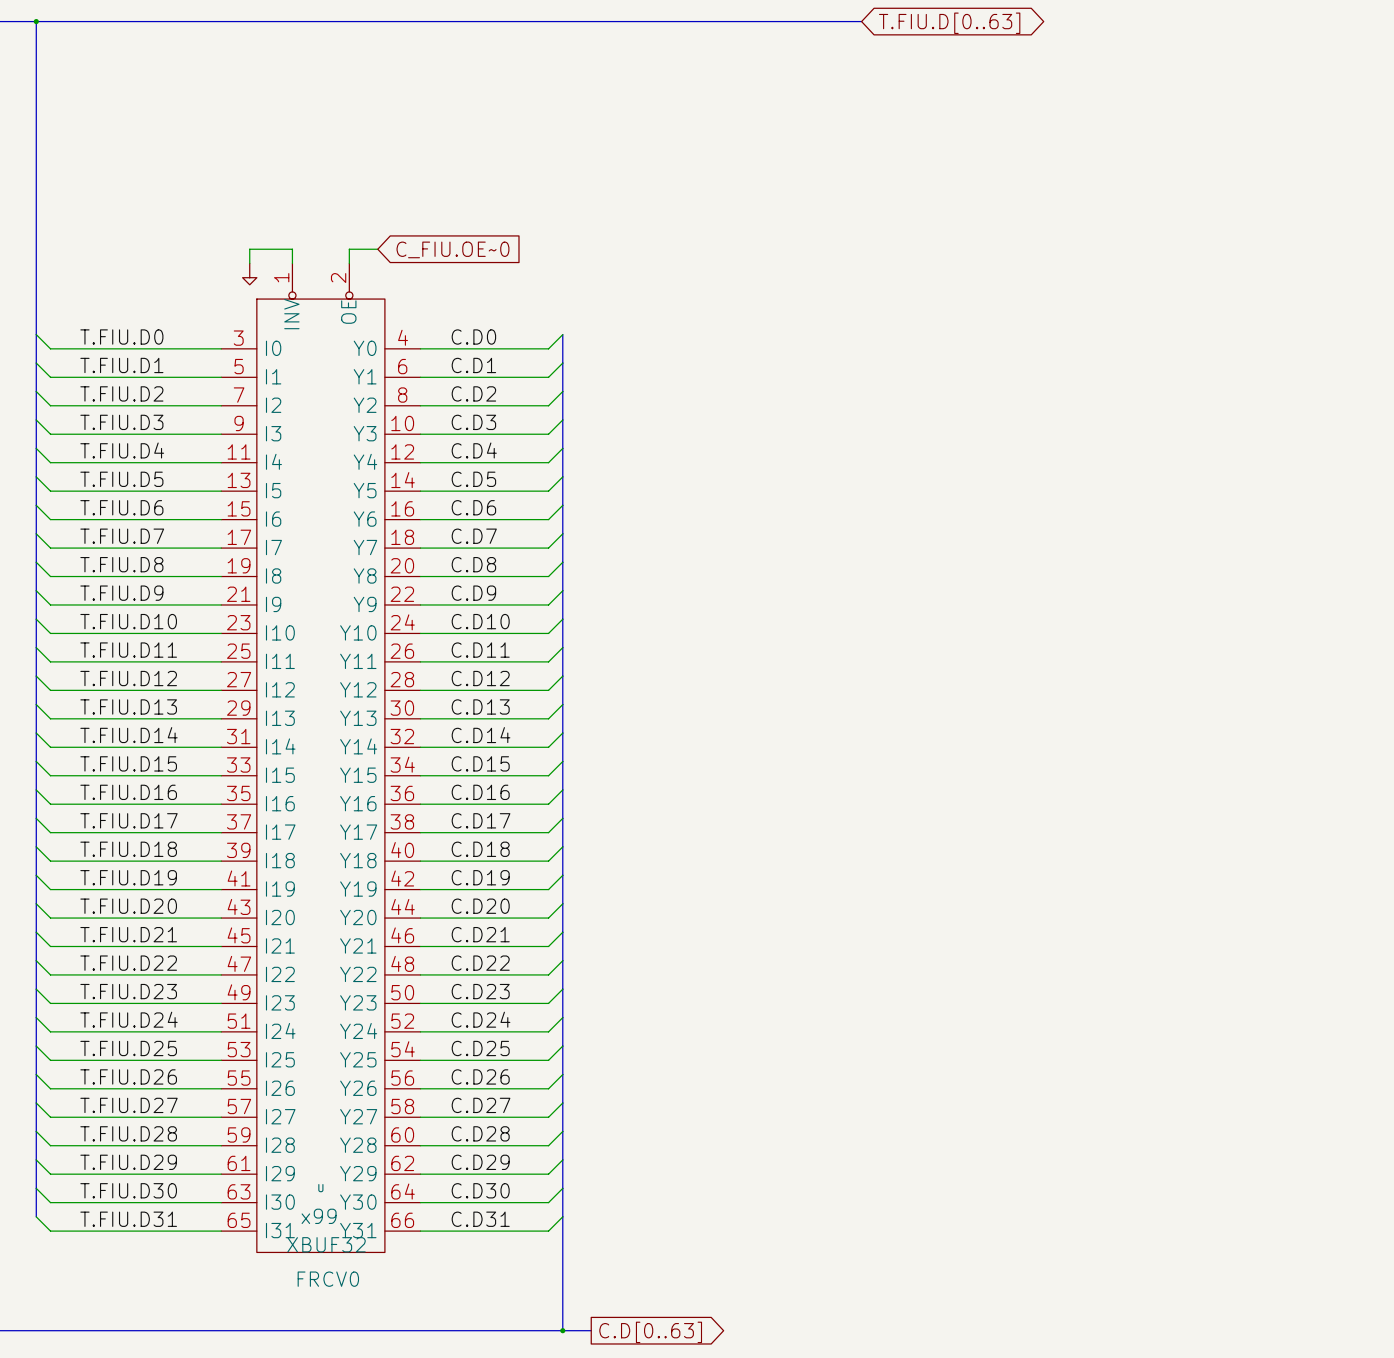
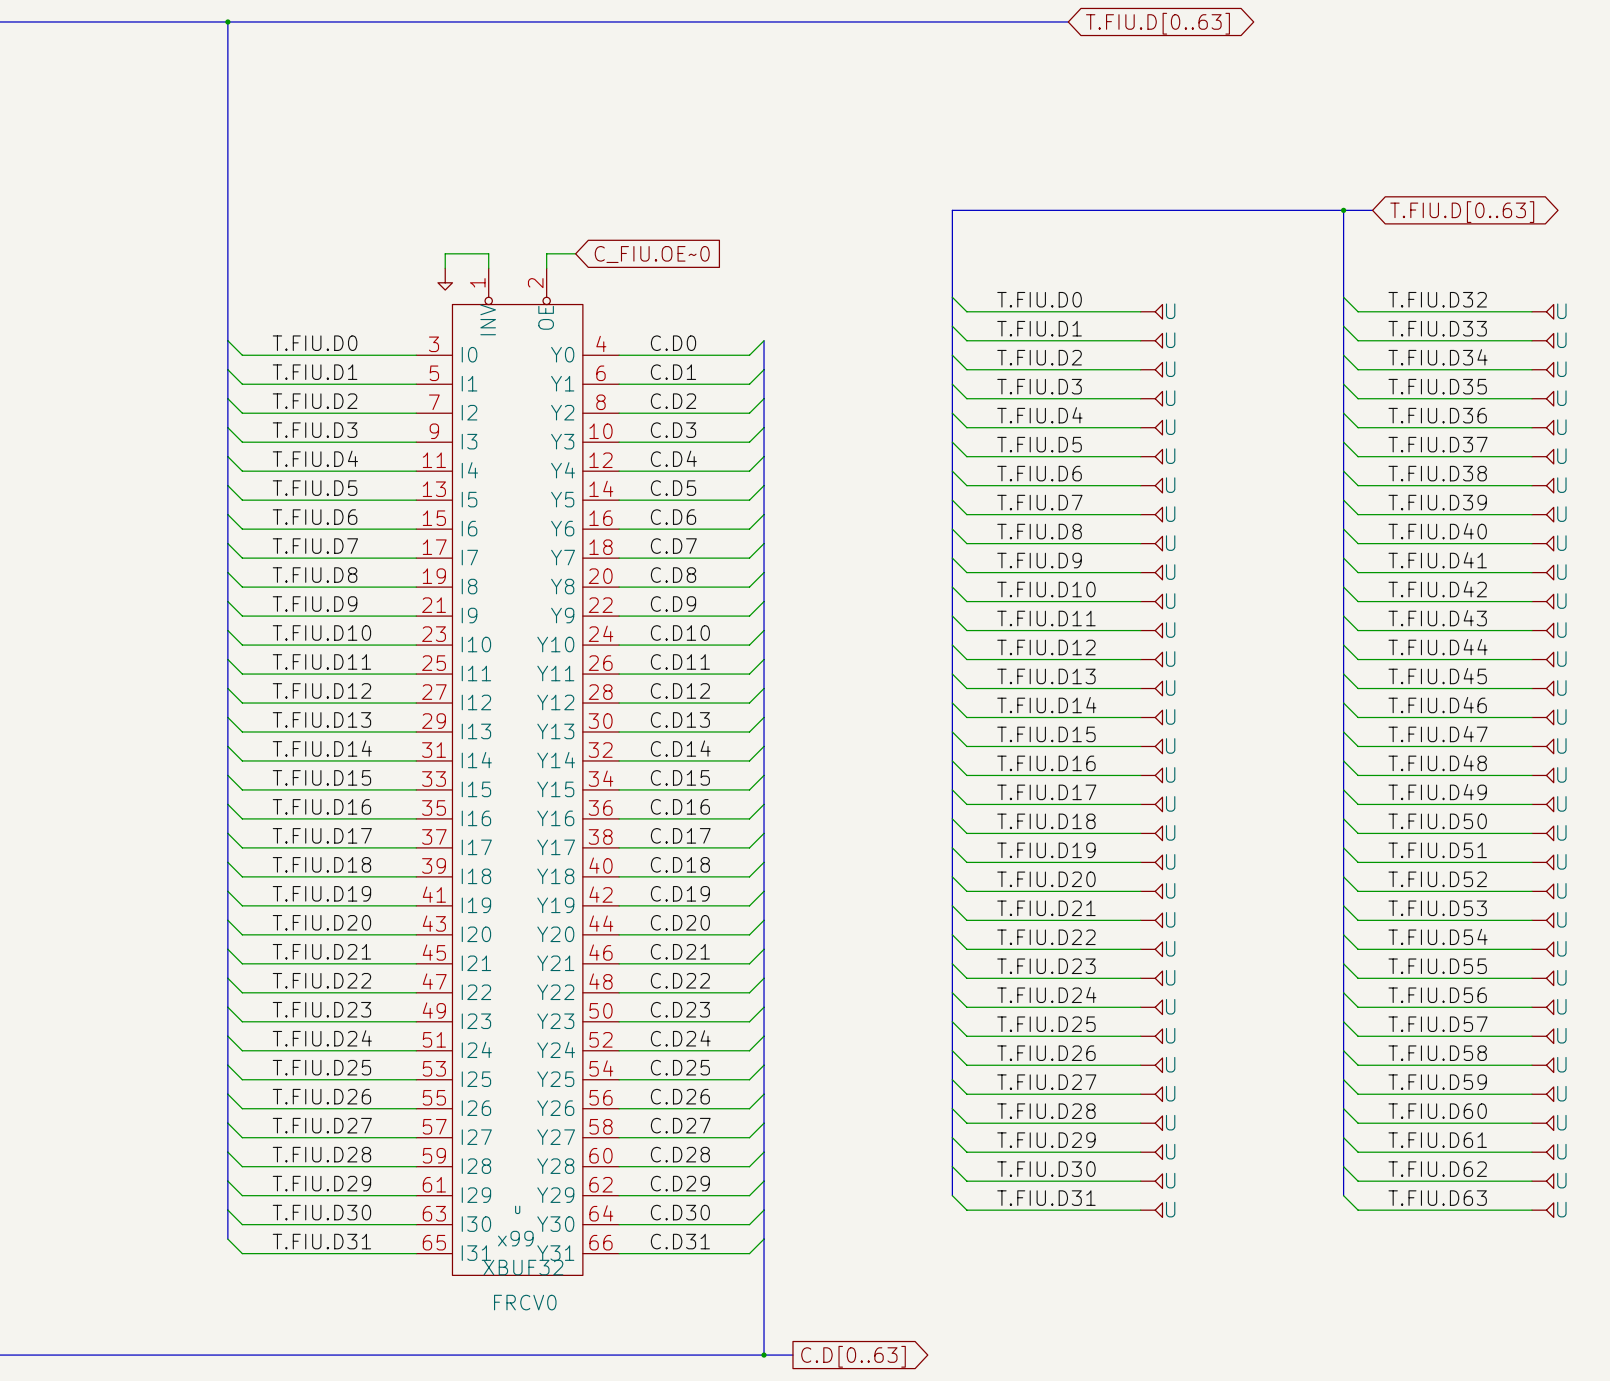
bus: none -> (1343, 210) (1343, 1195)
junction: none -> (1343, 210)
bus: none -> (1372, 210) (952, 210) (952, 1195)
global label: none -> T.FIU.D[0..63] (1462, 212)
wire: none -> (952, 297) (966, 311) (1140, 311)
wire: none -> (1343, 297) (1358, 311) (1531, 311)
label: none -> T.FIU.D0 (1039, 299)
label: none -> T.FIU.D32 (1437, 299)
U: none -> (1151, 311)
U: none -> (1543, 311)
wire: none -> (952, 326) (966, 340) (1140, 340)
wire: none -> (1343, 326) (1358, 340) (1531, 340)
label: none -> T.FIU.D1 (1039, 328)
label: none -> T.FIU.D33 (1437, 328)
U: none -> (1151, 340)
U: none -> (1543, 340)
wire: none -> (952, 355) (966, 369) (1140, 369)
wire: none -> (1343, 355) (1358, 369) (1531, 369)
label: none -> T.FIU.D34 (1438, 357)
label: none -> T.FIU.D2 (1039, 357)
U: none -> (1151, 369)
U: none -> (1543, 369)
wire: none -> (952, 384) (966, 398) (1140, 398)
wire: none -> (1343, 384) (1358, 398) (1531, 398)
label: none -> T.FIU.D3 (1039, 386)
label: none -> T.FIU.D35 (1437, 386)
U: none -> (1151, 398)
U: none -> (1543, 398)
wire: none -> (952, 413) (966, 427) (1140, 427)
wire: none -> (1343, 413) (1358, 427) (1531, 427)
label: none -> T.FIU.D4 (1039, 415)
label: none -> T.FIU.D36 (1437, 415)
U: none -> (1151, 427)
U: none -> (1543, 427)
wire: none -> (952, 442) (966, 456) (1140, 456)
wire: none -> (1343, 442) (1358, 456) (1531, 456)
label: none -> T.FIU.D5 (1039, 444)
label: none -> T.FIU.D37 (1438, 444)
U: none -> (1151, 456)
U: none -> (1543, 456)
wire: none -> (952, 471) (966, 485) (1140, 485)
wire: none -> (1343, 471) (1358, 485) (1531, 485)
label: none -> T.FIU.D6 (1039, 473)
label: none -> T.FIU.D38 (1437, 473)
U: none -> (1151, 485)
U: none -> (1543, 485)
wire: none -> (952, 500) (966, 514) (1140, 514)
wire: none -> (1343, 500) (1358, 514) (1531, 514)
label: none -> T.FIU.D7 (1039, 502)
label: none -> T.FIU.D39 (1437, 502)
U: none -> (1151, 514)
U: none -> (1543, 514)
wire: none -> (952, 529) (966, 543) (1140, 543)
wire: none -> (1343, 529) (1358, 543) (1531, 543)
label: none -> T.FIU.D8 (1039, 531)
label: none -> T.FIU.D40 (1437, 531)
U: none -> (1151, 543)
U: none -> (1543, 543)
wire: none -> (952, 558) (966, 572) (1140, 572)
wire: none -> (1343, 558) (1358, 572) (1531, 572)
label: none -> T.FIU.D9 (1039, 560)
label: none -> T.FIU.D41 (1437, 560)
U: none -> (1151, 572)
U: none -> (1543, 572)
wire: none -> (952, 587) (966, 601) (1140, 601)
wire: none -> (1343, 587) (1358, 601) (1531, 601)
label: none -> T.FIU.D10 (1046, 589)
label: none -> T.FIU.D42 (1437, 589)
U: none -> (1151, 601)
U: none -> (1543, 601)
wire: none -> (952, 616) (966, 630) (1140, 630)
wire: none -> (1343, 616) (1358, 630) (1531, 630)
label: none -> T.FIU.D11 (1046, 618)
label: none -> T.FIU.D43 (1437, 618)
U: none -> (1151, 630)
U: none -> (1543, 630)
wire: none -> (952, 645) (966, 659) (1140, 659)
wire: none -> (1343, 645) (1358, 659) (1531, 659)
label: none -> T.FIU.D12 (1046, 647)
label: none -> T.FIU.D44 (1438, 647)
U: none -> (1151, 659)
U: none -> (1543, 659)
wire: none -> (952, 674) (966, 688) (1140, 688)
wire: none -> (1343, 674) (1358, 688) (1531, 688)
label: none -> T.FIU.D45 (1437, 676)
label: none -> T.FIU.D13 (1046, 676)
U: none -> (1151, 688)
U: none -> (1543, 688)
wire: none -> (952, 703) (966, 717) (1140, 717)
wire: none -> (1343, 703) (1358, 717) (1531, 717)
label: none -> T.FIU.D14 (1046, 705)
label: none -> T.FIU.D46 (1437, 705)
U: none -> (1151, 717)
U: none -> (1543, 717)
wire: none -> (952, 731) (966, 746) (1140, 746)
wire: none -> (1343, 731) (1358, 746) (1531, 746)
label: none -> T.FIU.D47 (1438, 734)
label: none -> T.FIU.D15 (1046, 734)
U: none -> (1151, 746)
U: none -> (1543, 746)
wire: none -> (952, 760) (966, 775) (1140, 775)
wire: none -> (1343, 760) (1358, 775) (1531, 775)
label: none -> T.FIU.D16 (1046, 763)
label: none -> T.FIU.D48 (1437, 763)
U: none -> (1151, 775)
U: none -> (1543, 775)
wire: none -> (952, 789) (966, 804) (1140, 804)
wire: none -> (1343, 789) (1358, 804) (1531, 804)
label: none -> T.FIU.D49 (1437, 792)
label: none -> T.FIU.D17 (1046, 792)
U: none -> (1151, 804)
U: none -> (1543, 804)
wire: none -> (952, 818) (966, 833) (1140, 833)
wire: none -> (1343, 818) (1358, 833) (1531, 833)
label: none -> T.FIU.D18 (1046, 821)
label: none -> T.FIU.D50 (1437, 821)
U: none -> (1151, 833)
U: none -> (1543, 833)
wire: none -> (952, 847) (966, 862) (1140, 862)
wire: none -> (1343, 847) (1358, 862) (1531, 862)
label: none -> T.FIU.D19 (1046, 850)
label: none -> T.FIU.D51 (1437, 850)
U: none -> (1151, 862)
U: none -> (1543, 862)
wire: none -> (952, 876) (966, 891) (1140, 891)
wire: none -> (1343, 876) (1358, 891) (1531, 891)
label: none -> T.FIU.D20 (1046, 879)
label: none -> T.FIU.D52 (1437, 879)
U: none -> (1151, 891)
U: none -> (1543, 891)
wire: none -> (952, 905) (966, 920) (1140, 920)
wire: none -> (1343, 905) (1358, 920) (1531, 920)
label: none -> T.FIU.D21 (1046, 908)
label: none -> T.FIU.D53 (1437, 908)
U: none -> (1151, 920)
U: none -> (1543, 920)
wire: none -> (952, 934) (966, 949) (1140, 949)
wire: none -> (1343, 934) (1358, 949) (1531, 949)
label: none -> T.FIU.D22 (1046, 937)
label: none -> T.FIU.D54 (1438, 936)
U: none -> (1151, 949)
U: none -> (1543, 949)
wire: none -> (952, 963) (966, 978) (1140, 978)
wire: none -> (1343, 963) (1358, 978) (1531, 978)
label: none -> T.FIU.D23 (1046, 966)
label: none -> T.FIU.D55 (1437, 966)
U: none -> (1151, 978)
U: none -> (1543, 978)
wire: none -> (952, 992) (966, 1007) (1140, 1007)
wire: none -> (1343, 992) (1358, 1007) (1531, 1007)
label: none -> T.FIU.D24 (1046, 994)
label: none -> T.FIU.D56 (1437, 995)
U: none -> (1151, 1007)
U: none -> (1543, 1007)
wire: none -> (952, 1021) (966, 1036) (1140, 1036)
wire: none -> (1343, 1021) (1358, 1036) (1531, 1036)
label: none -> T.FIU.D25 (1046, 1024)
label: none -> T.FIU.D57 (1438, 1024)
U: none -> (1151, 1036)
U: none -> (1543, 1036)
wire: none -> (952, 1050) (966, 1065) (1140, 1065)
wire: none -> (1343, 1050) (1358, 1065) (1531, 1065)
label: none -> T.FIU.D26 (1046, 1053)
label: none -> T.FIU.D58 (1437, 1053)
U: none -> (1151, 1065)
U: none -> (1543, 1065)
wire: none -> (952, 1079) (966, 1094) (1140, 1094)
wire: none -> (1343, 1079) (1358, 1094) (1531, 1094)
label: none -> T.FIU.D27 (1046, 1082)
label: none -> T.FIU.D59 (1437, 1082)
U: none -> (1151, 1094)
U: none -> (1543, 1094)
wire: none -> (952, 1108) (966, 1123) (1140, 1123)
wire: none -> (1343, 1108) (1358, 1123) (1531, 1123)
label: none -> T.FIU.D28 (1046, 1111)
label: none -> T.FIU.D60 (1437, 1111)
U: none -> (1151, 1123)
U: none -> (1543, 1123)
wire: none -> (952, 1137) (966, 1152) (1140, 1152)
wire: none -> (1343, 1137) (1358, 1152) (1531, 1152)
label: none -> T.FIU.D29 (1046, 1140)
label: none -> T.FIU.D61 (1437, 1140)
U: none -> (1151, 1152)
U: none -> (1543, 1152)
wire: none -> (952, 1166) (966, 1181) (1140, 1181)
wire: none -> (1343, 1166) (1358, 1181) (1531, 1181)
label: none -> T.FIU.D30 (1046, 1169)
label: none -> T.FIU.D62 (1437, 1169)
U: none -> (1151, 1181)
U: none -> (1543, 1181)
wire: none -> (952, 1195) (966, 1210) (1140, 1210)
wire: none -> (1343, 1195) (1358, 1210) (1531, 1210)
label: none -> T.FIU.D31 (1046, 1198)
label: none -> T.FIU.D63 (1437, 1198)
U: none -> (1151, 1210)
U: none -> (1543, 1210)

